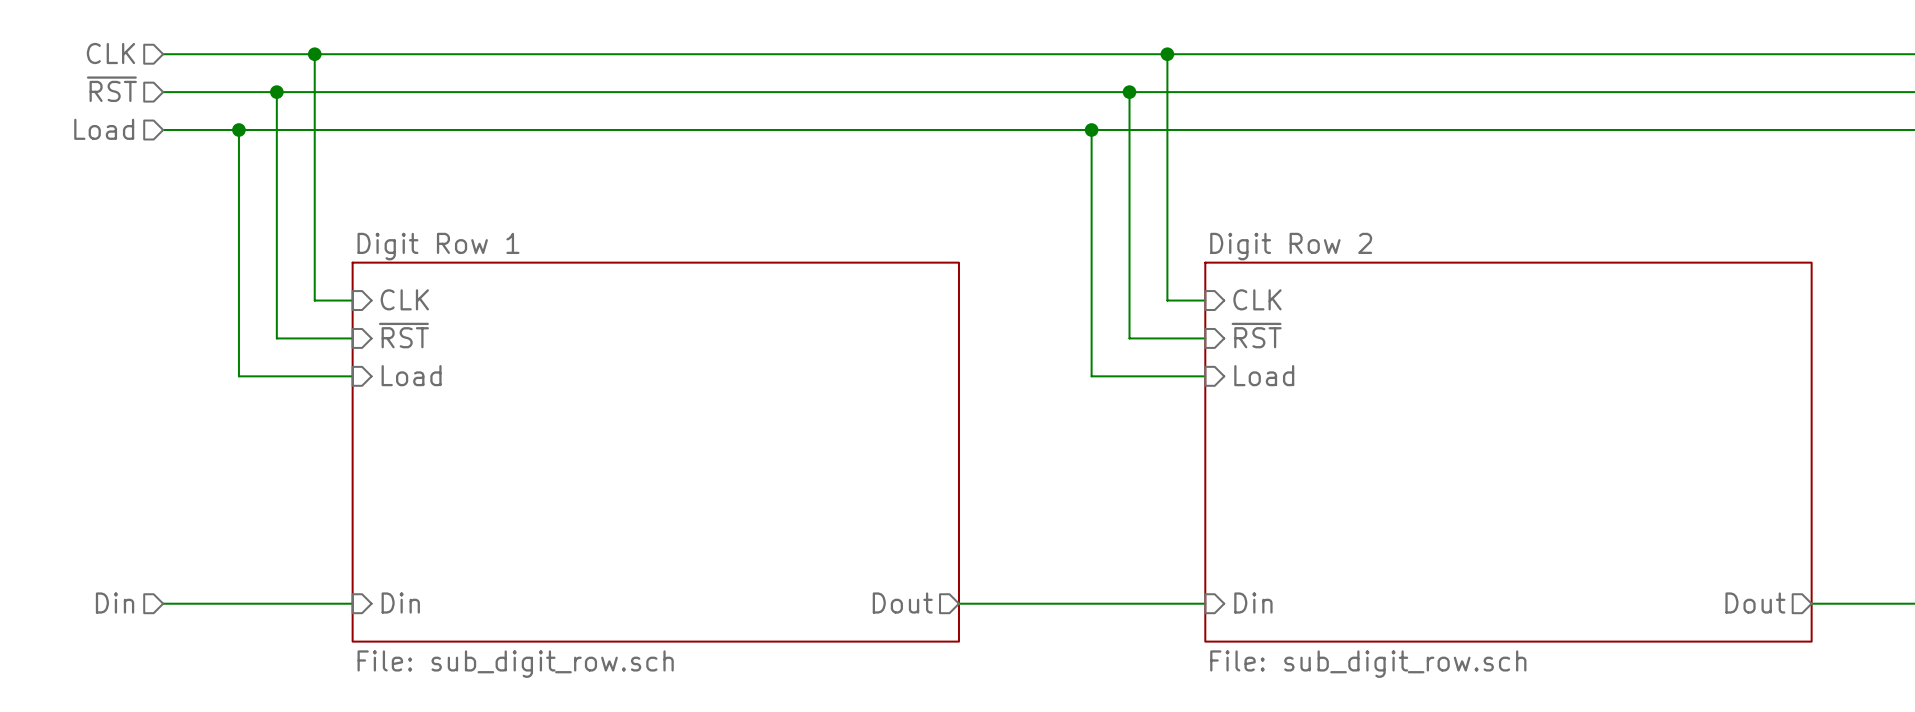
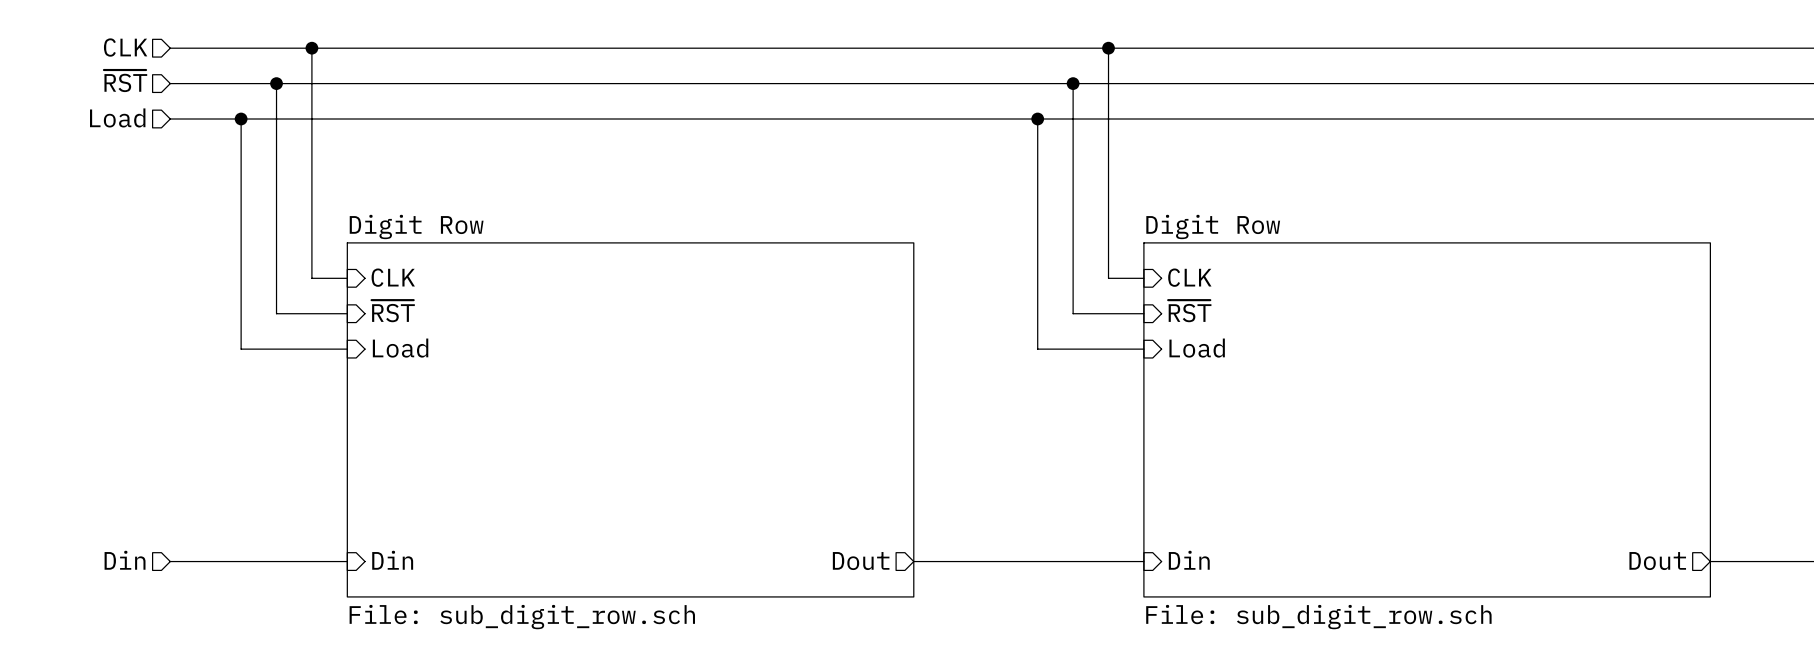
sheet Digit Row 1 name: Digit Row 1 (438, 246) -> Digit Row (416, 226)
sheet Digit Row 2 name: Digit Row 2 (1291, 246) -> Digit Row (1213, 226)

